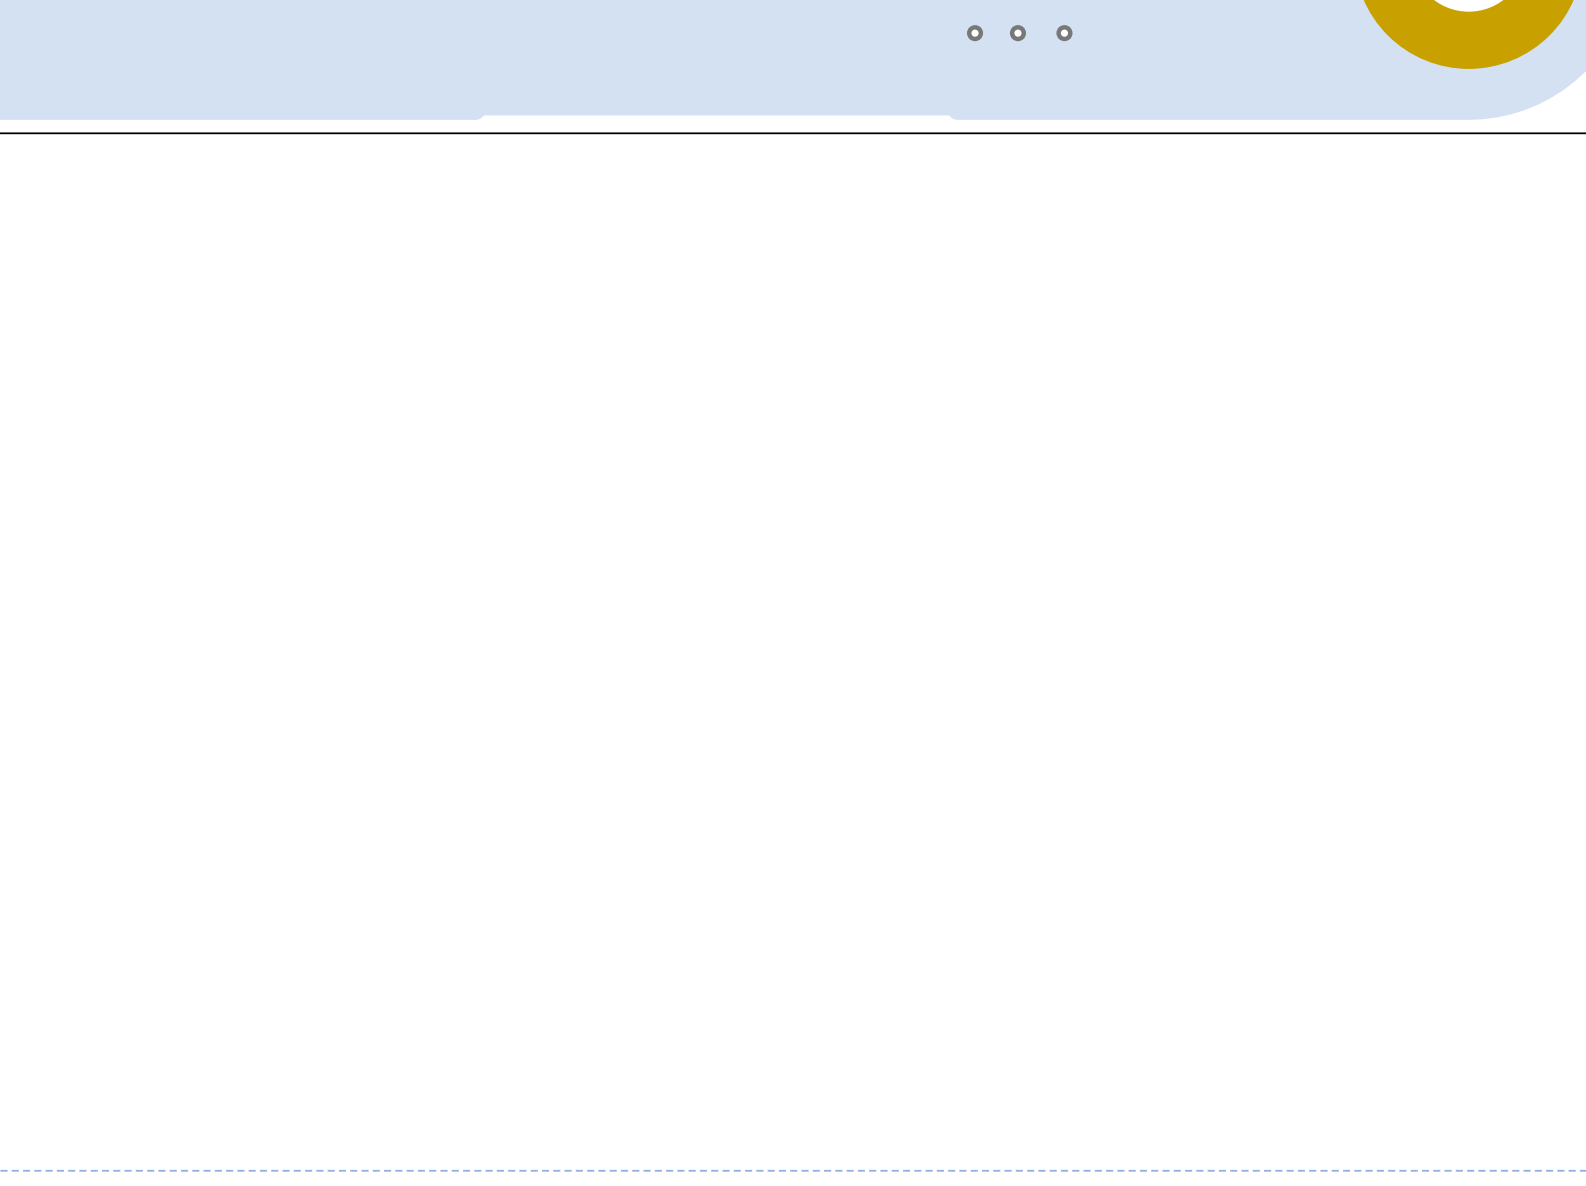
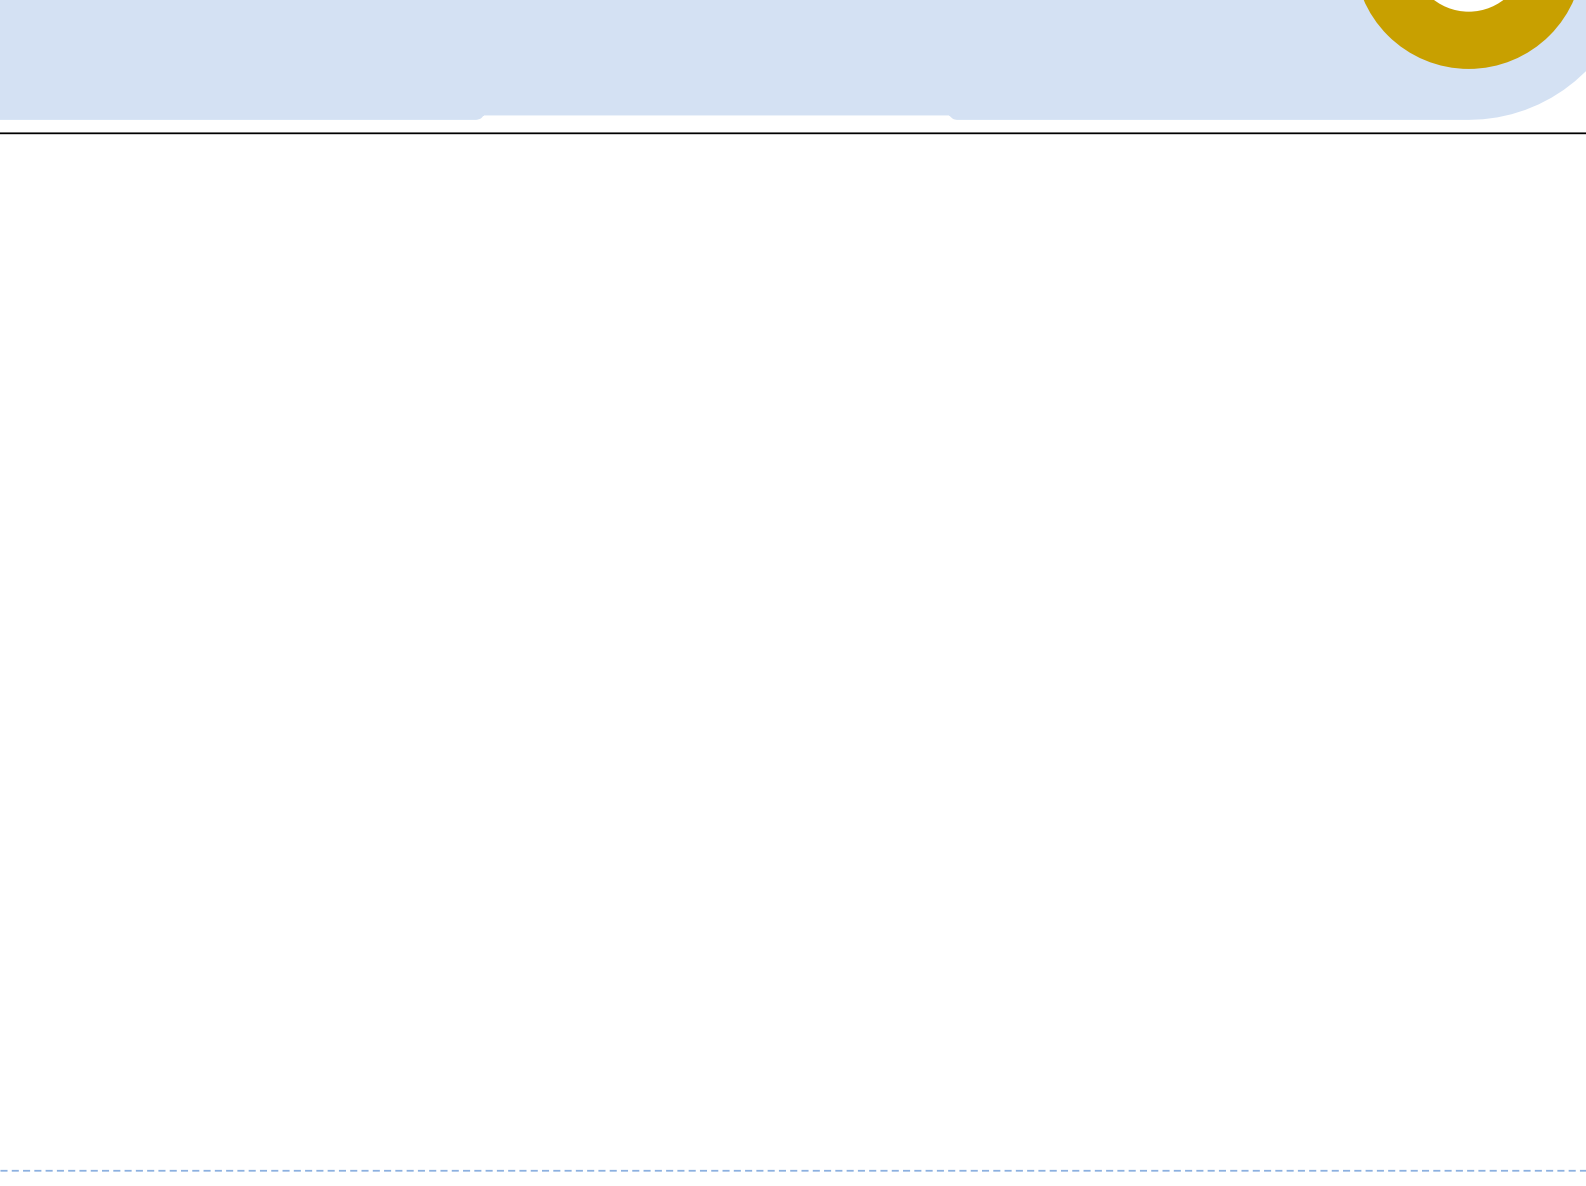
via: (975, 33) -> none
via: (1017, 33) -> none
via: (1064, 33) -> none

